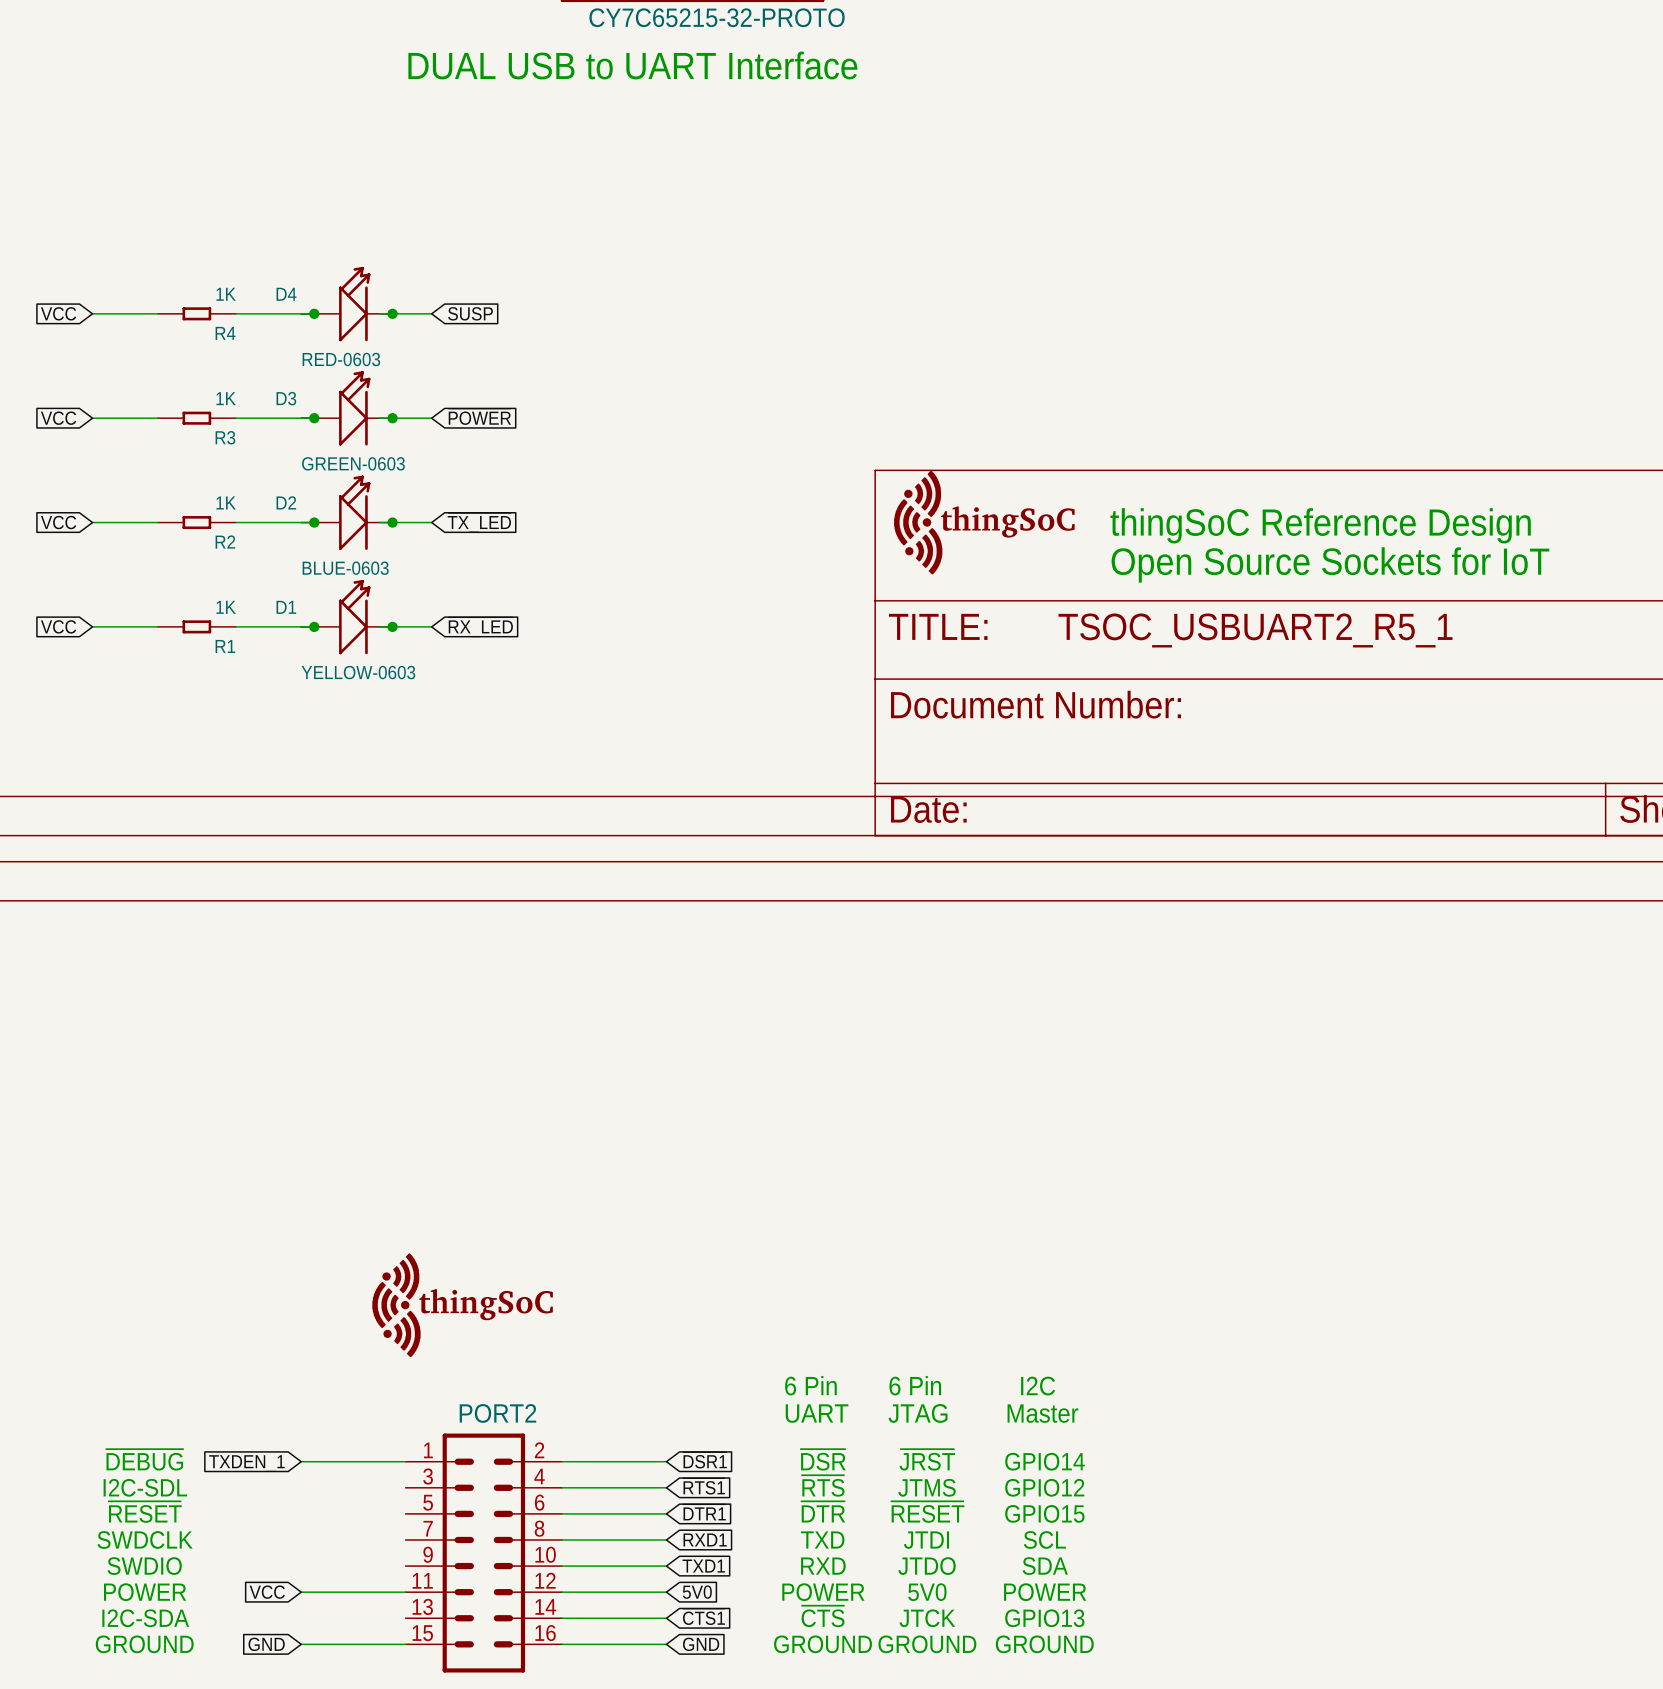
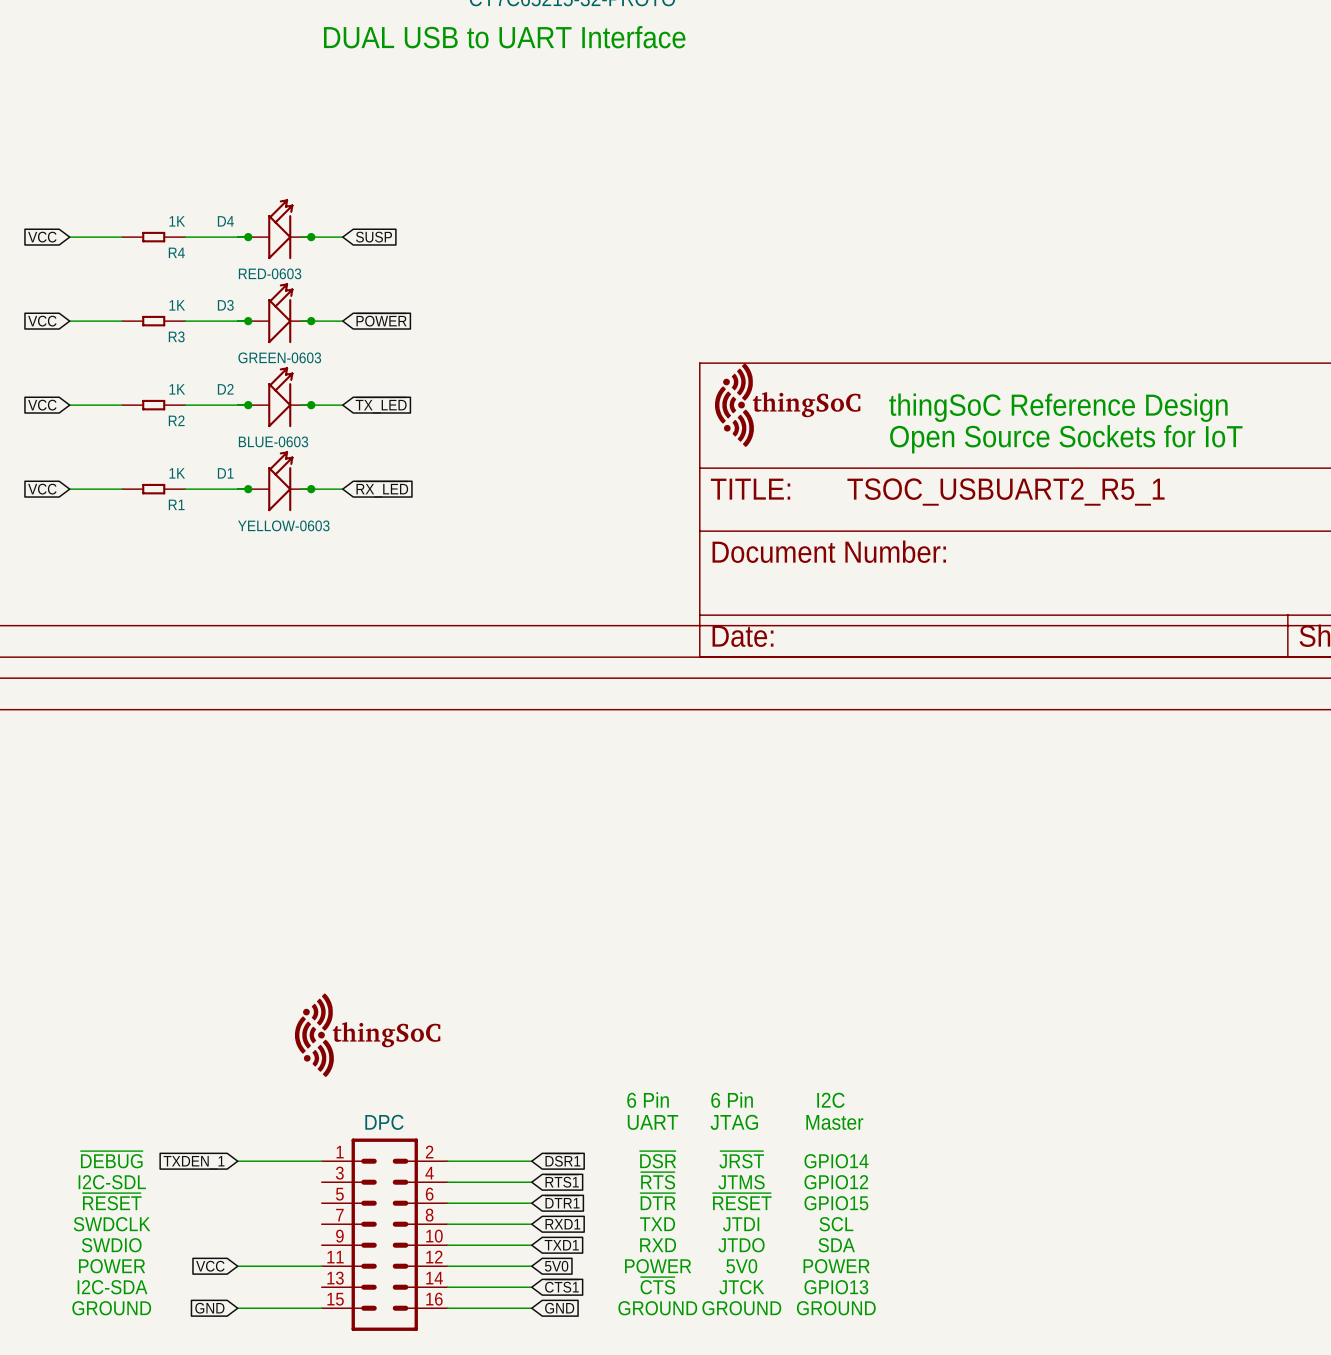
PORT2 name: PORT2 (497, 1413) -> DPC (384, 1122)

